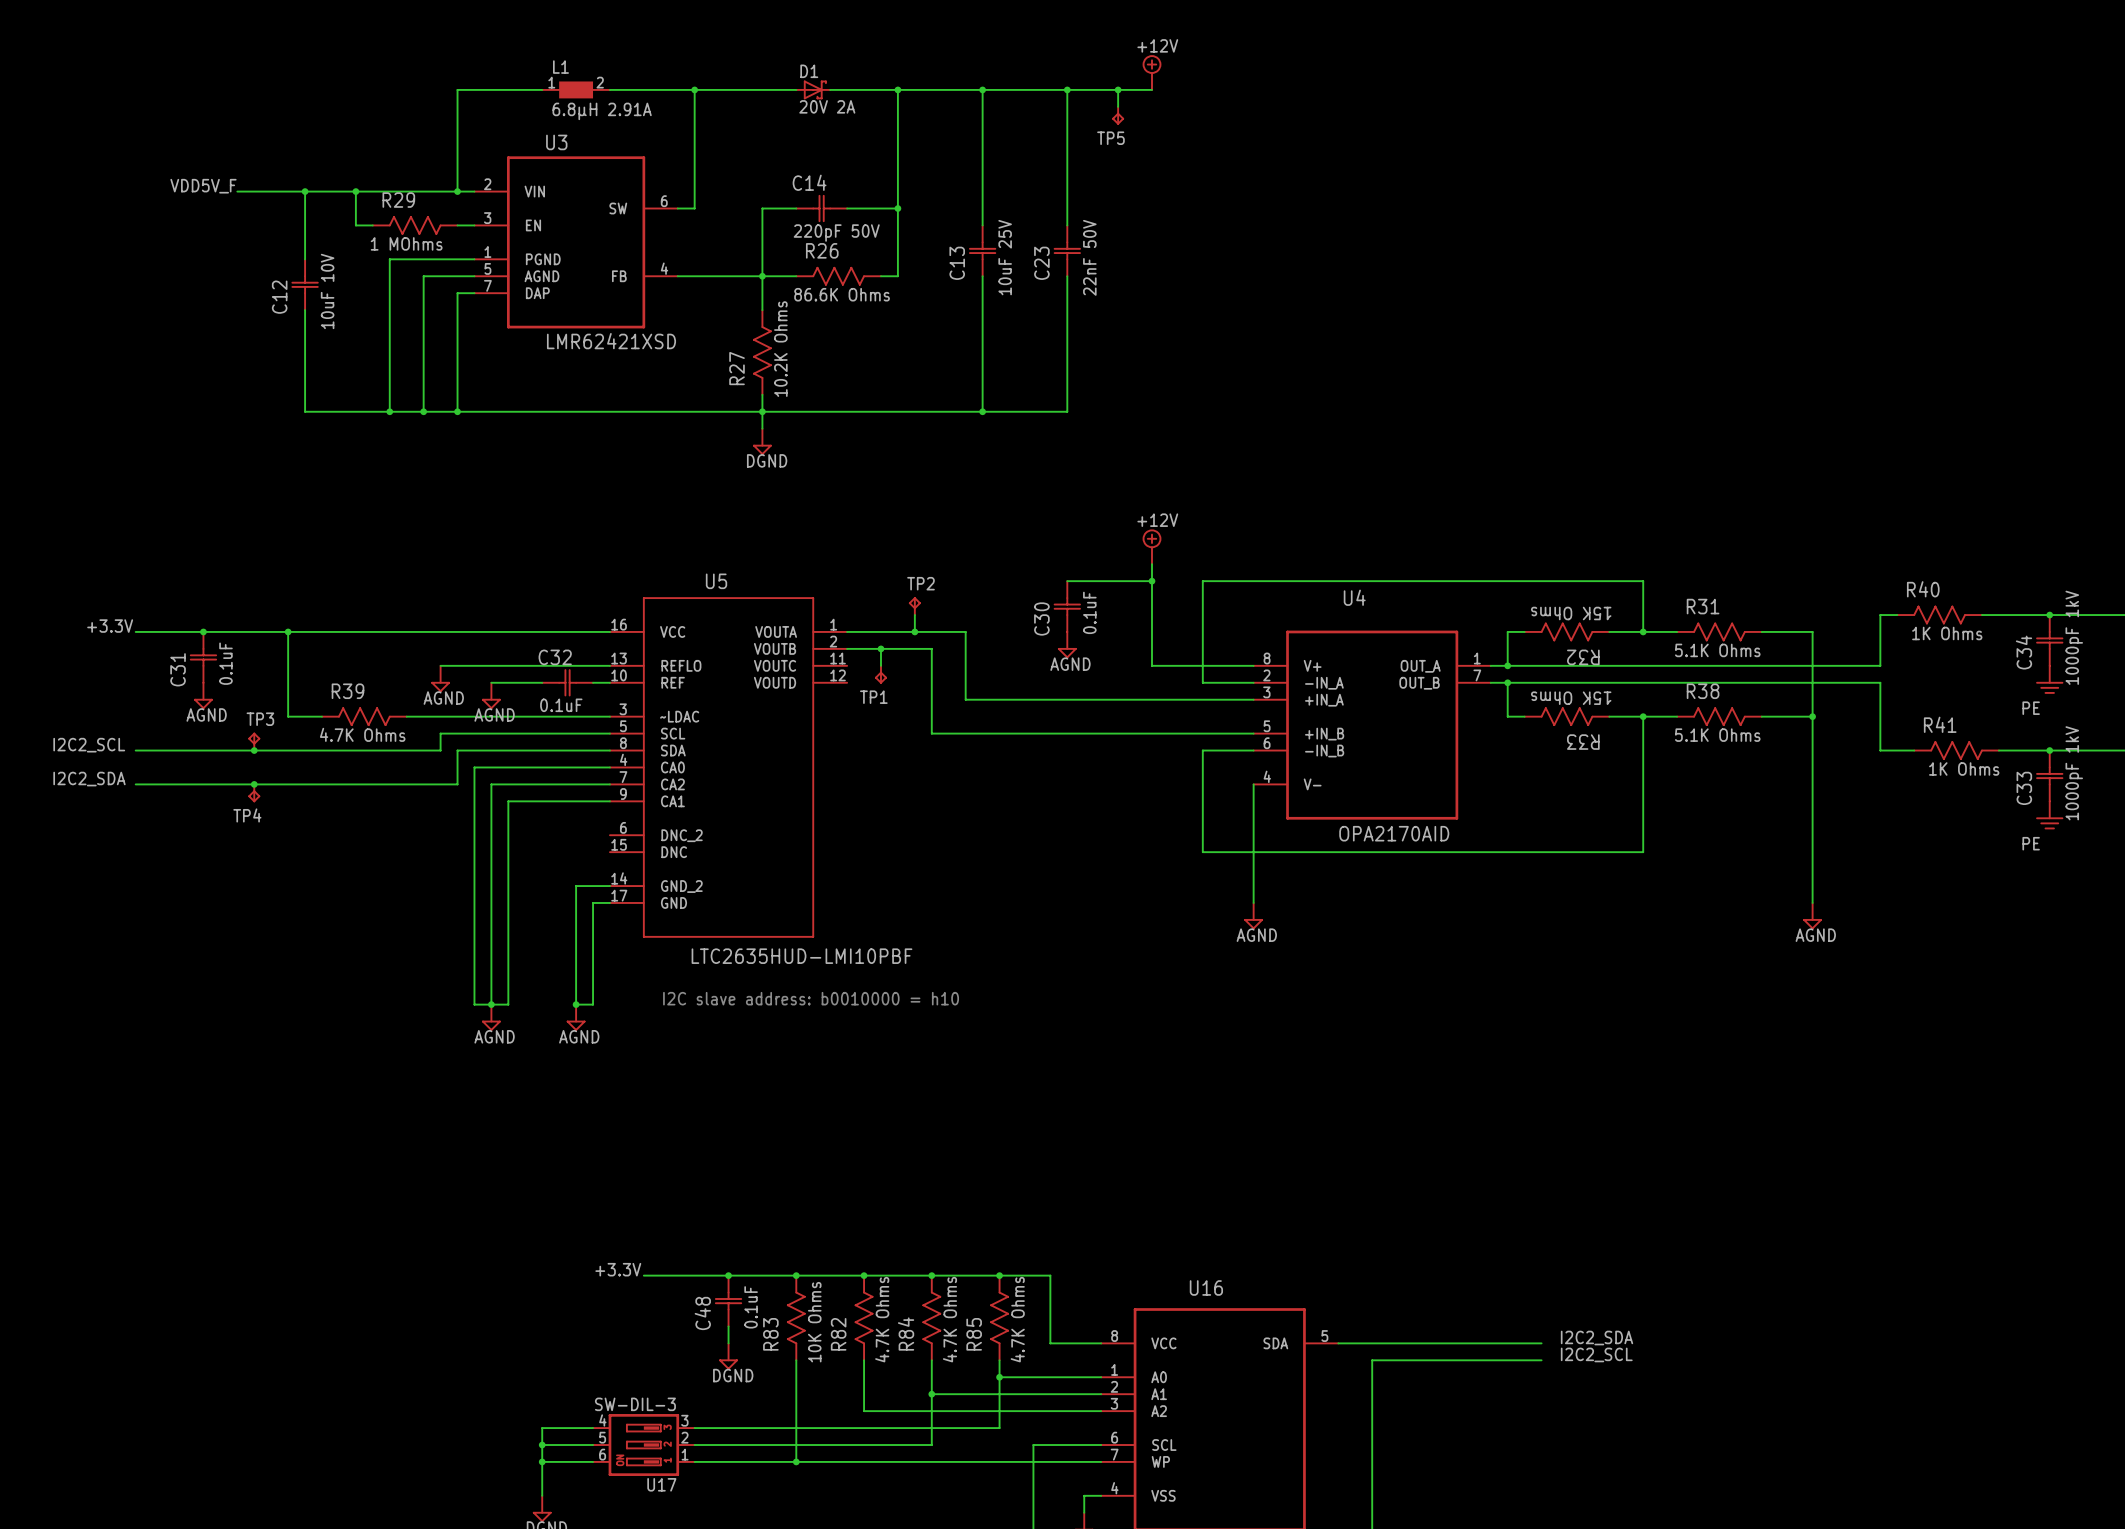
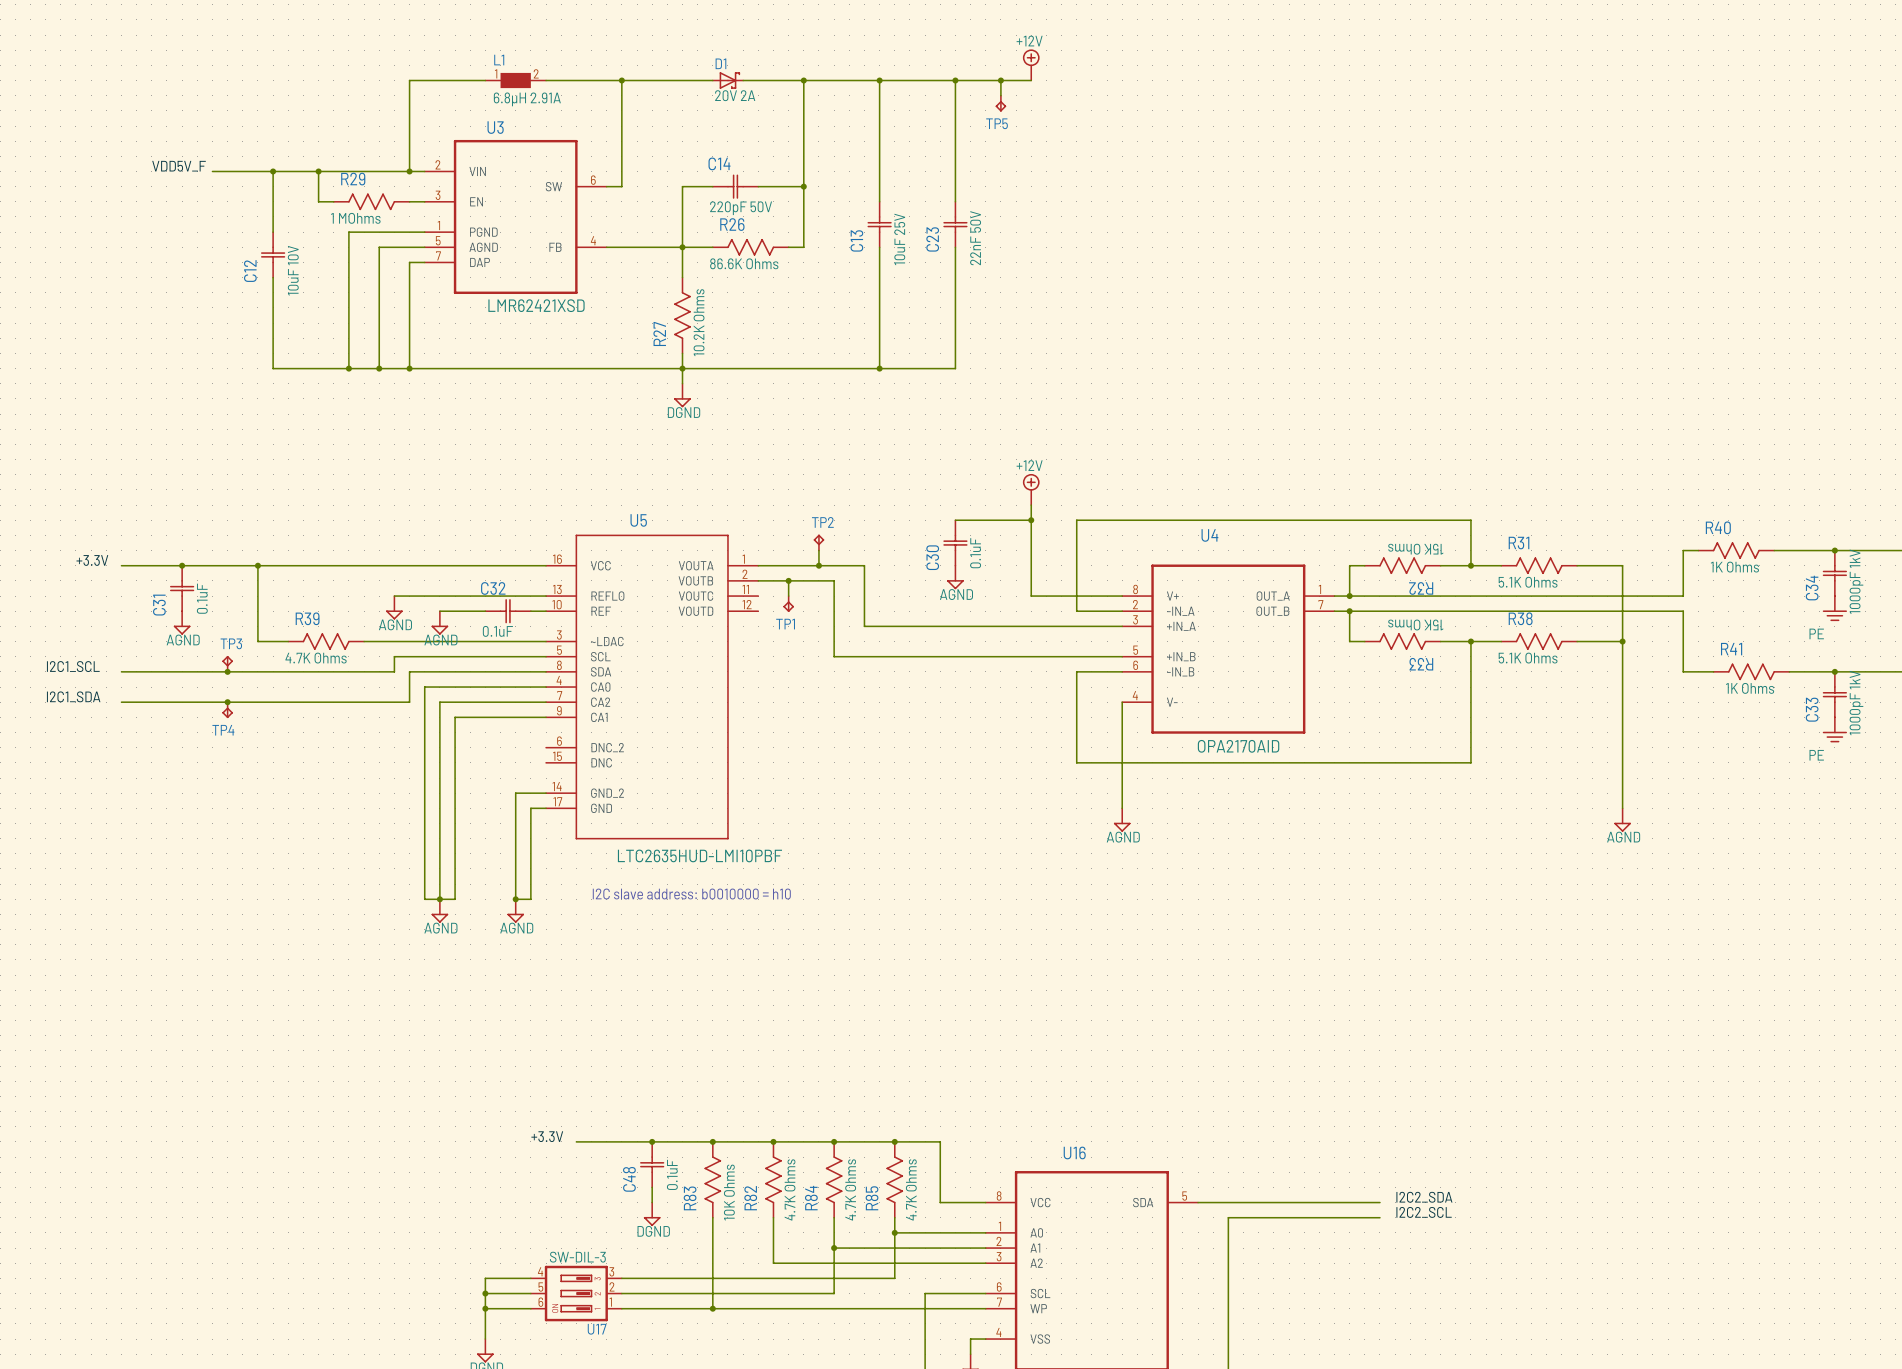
label: I2C2_SCL (89, 745) -> I2C1_SCL (73, 666)
label: I2C2_SDA (89, 779) -> I2C1_SDA (73, 696)

